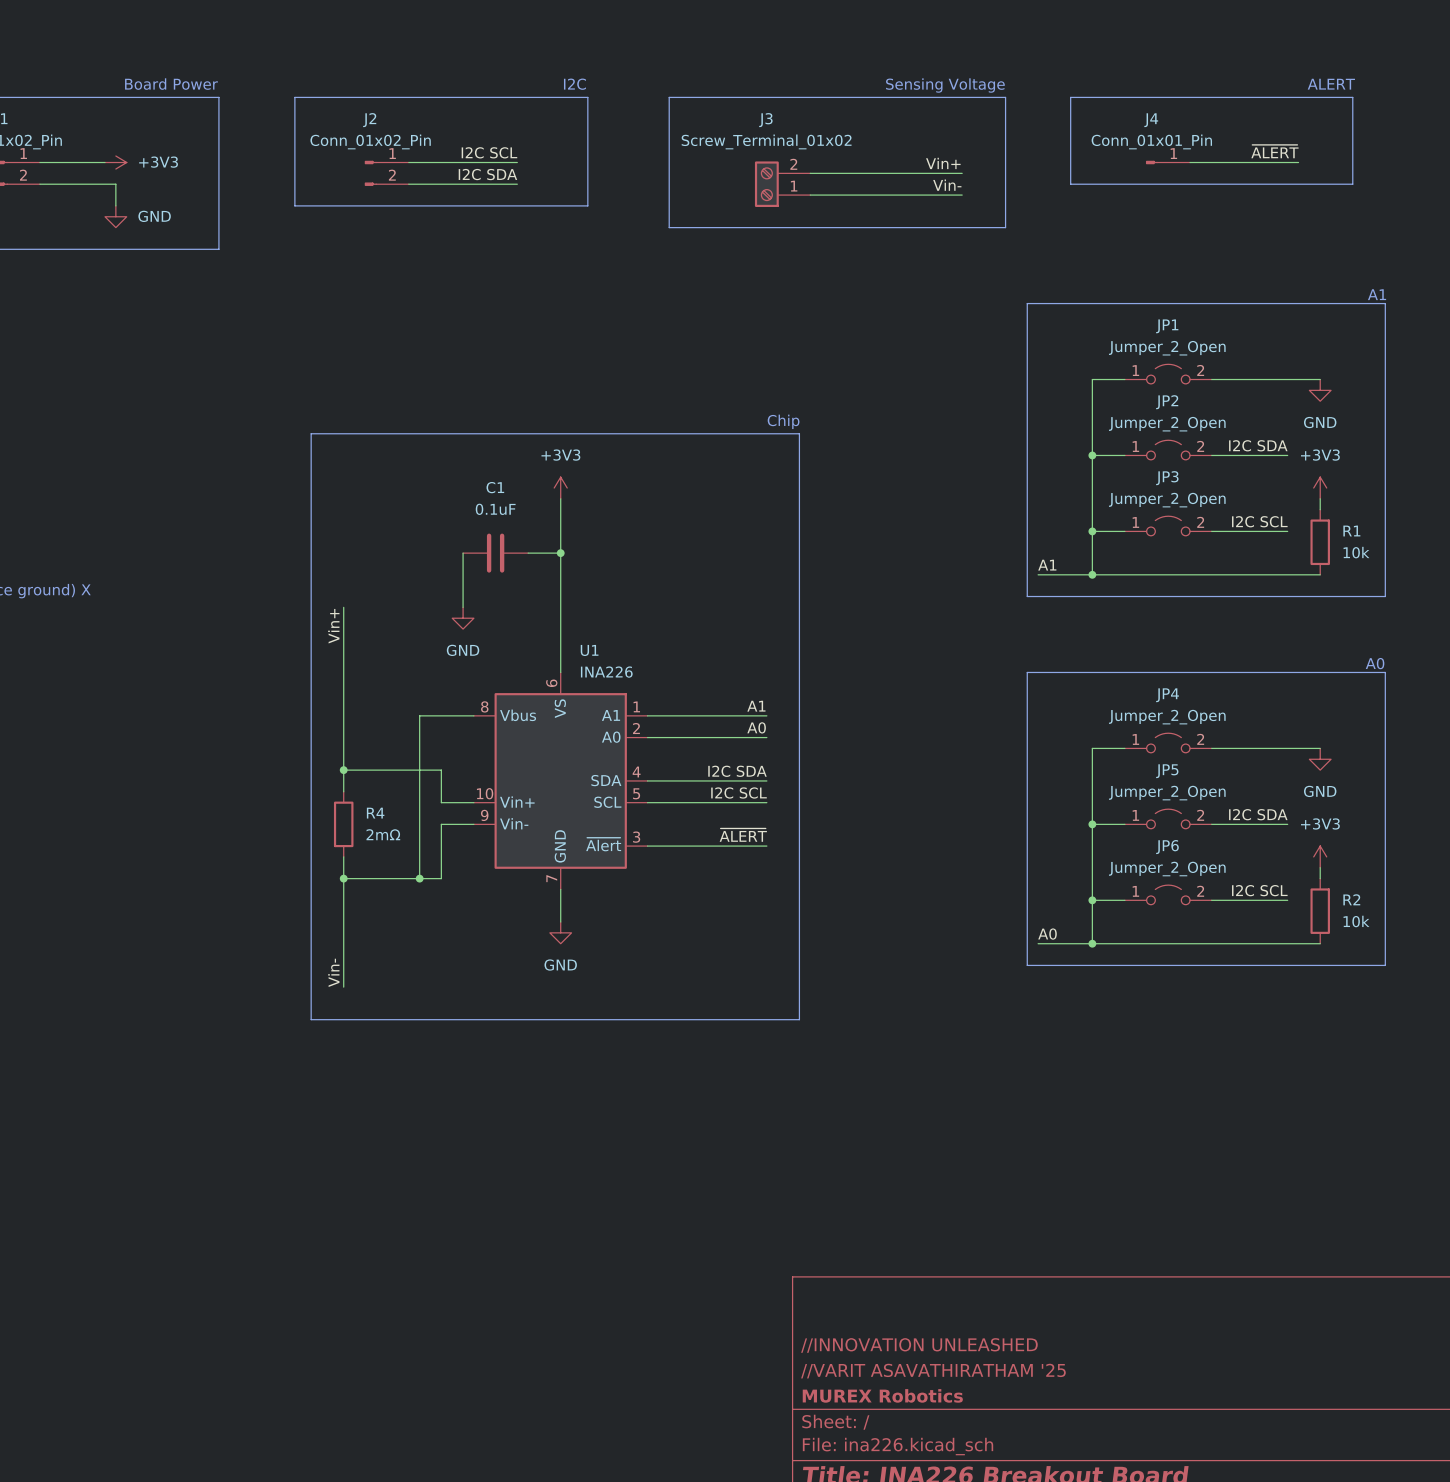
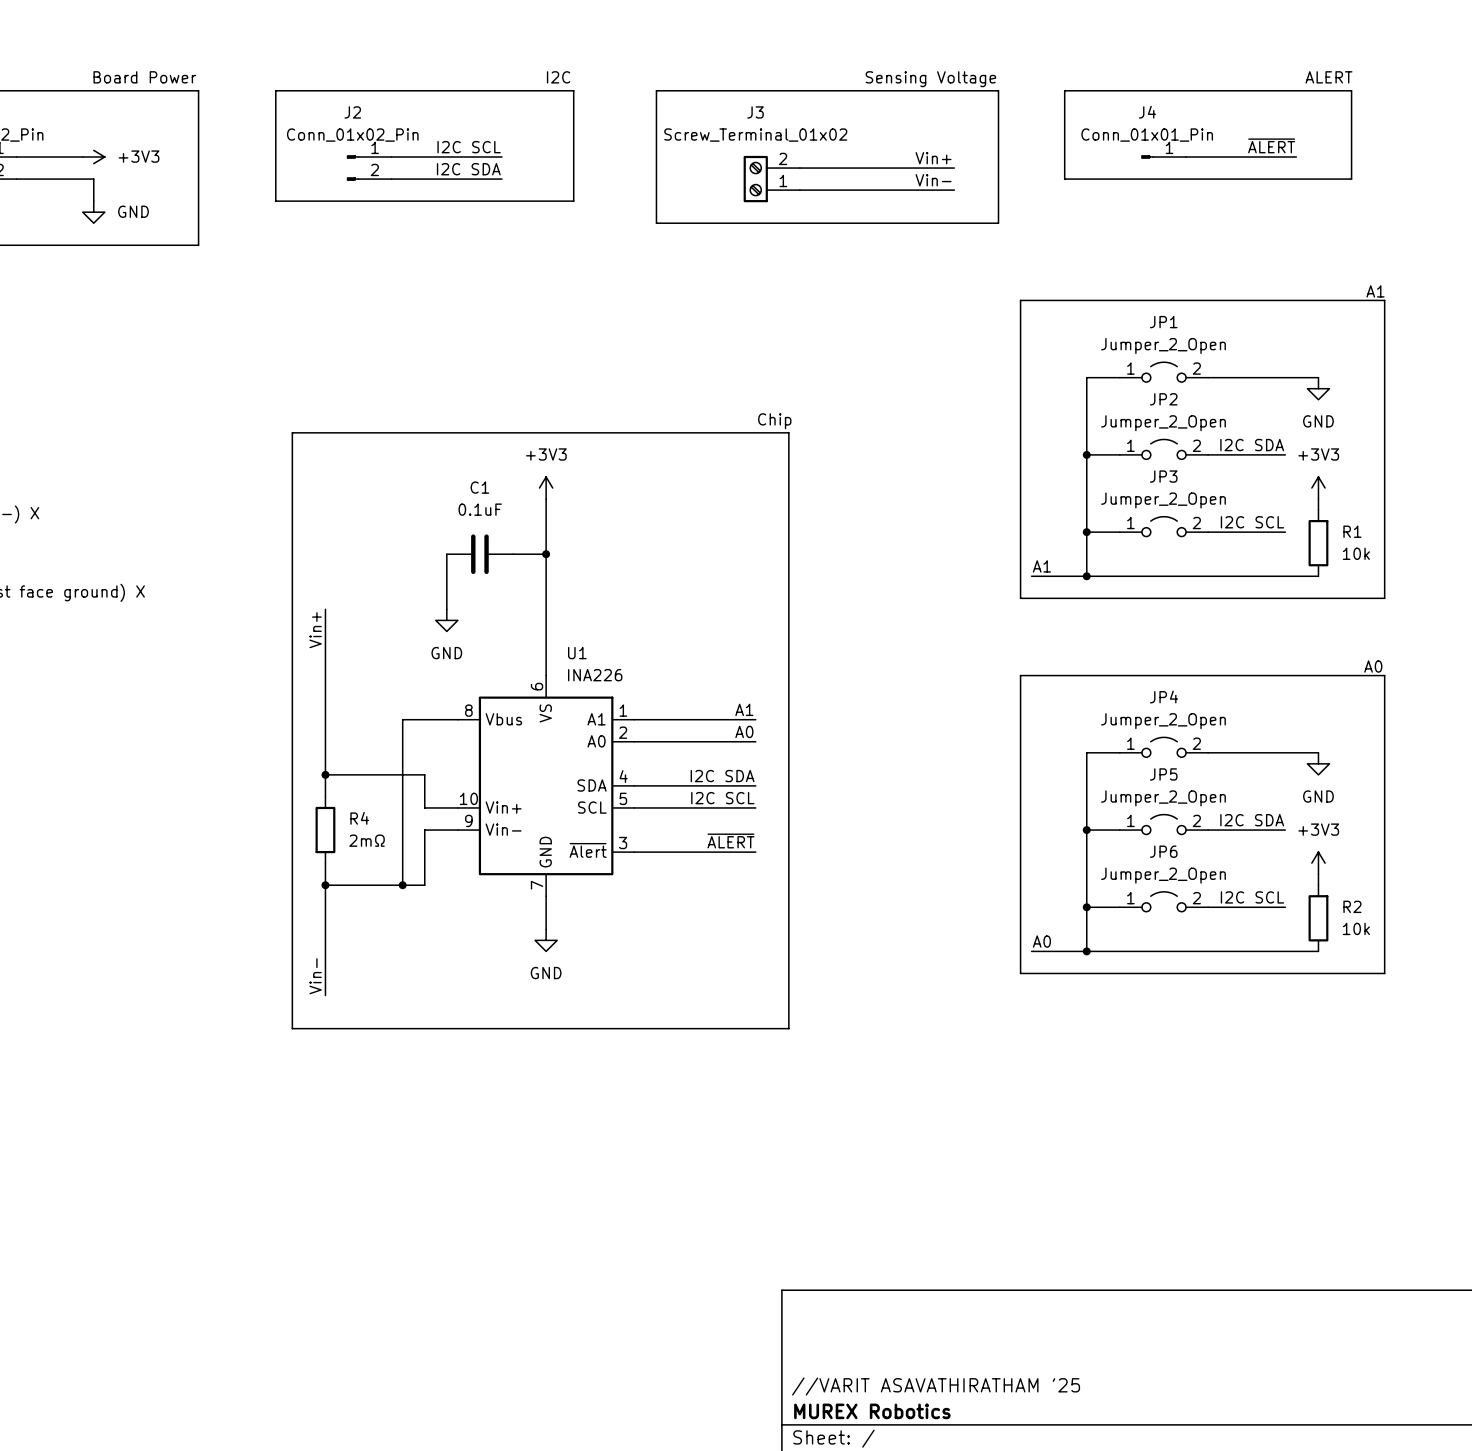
title block: //INNOVATION UNLEASHED (919, 1345) -> none

